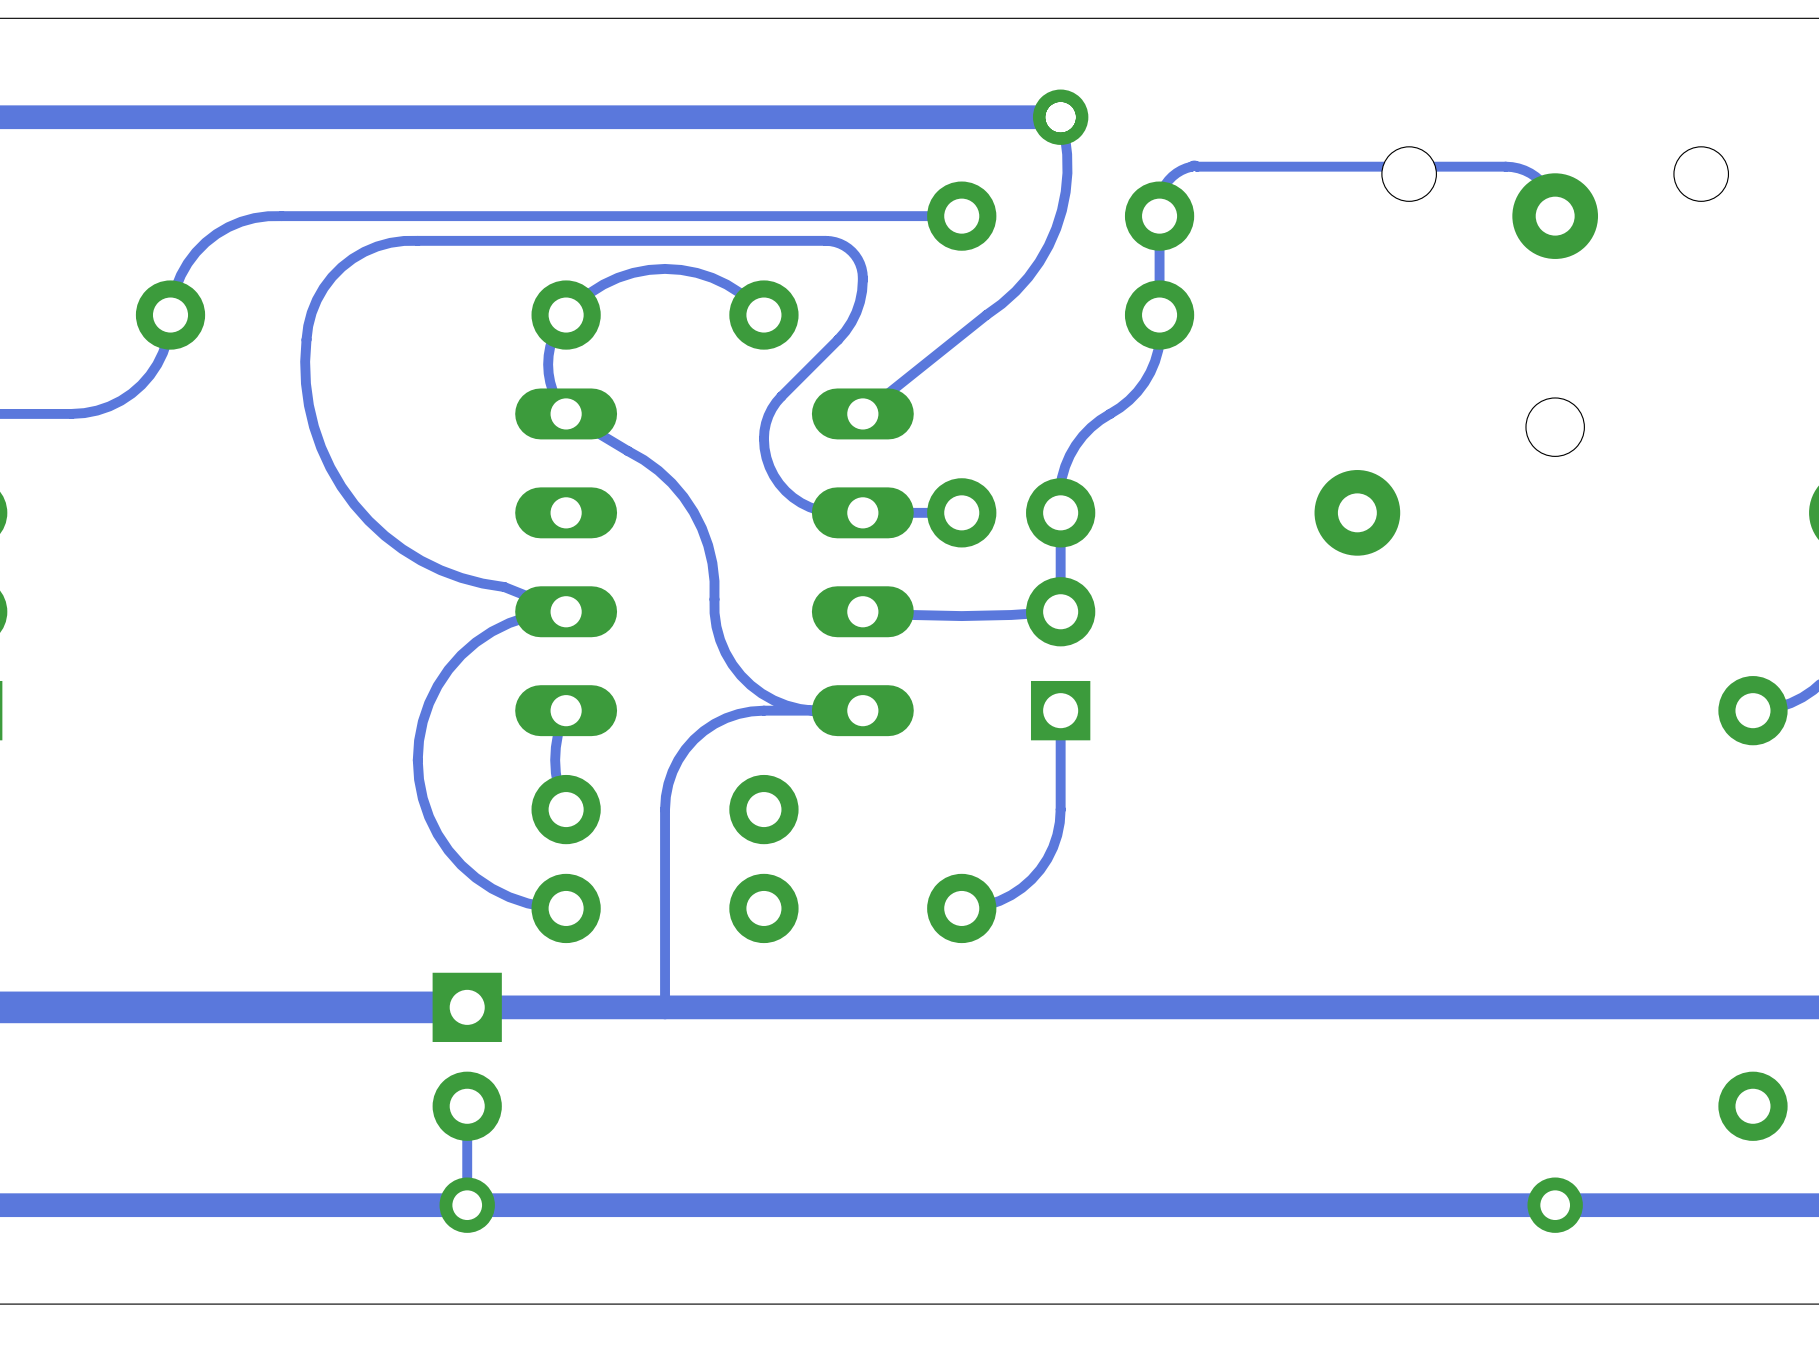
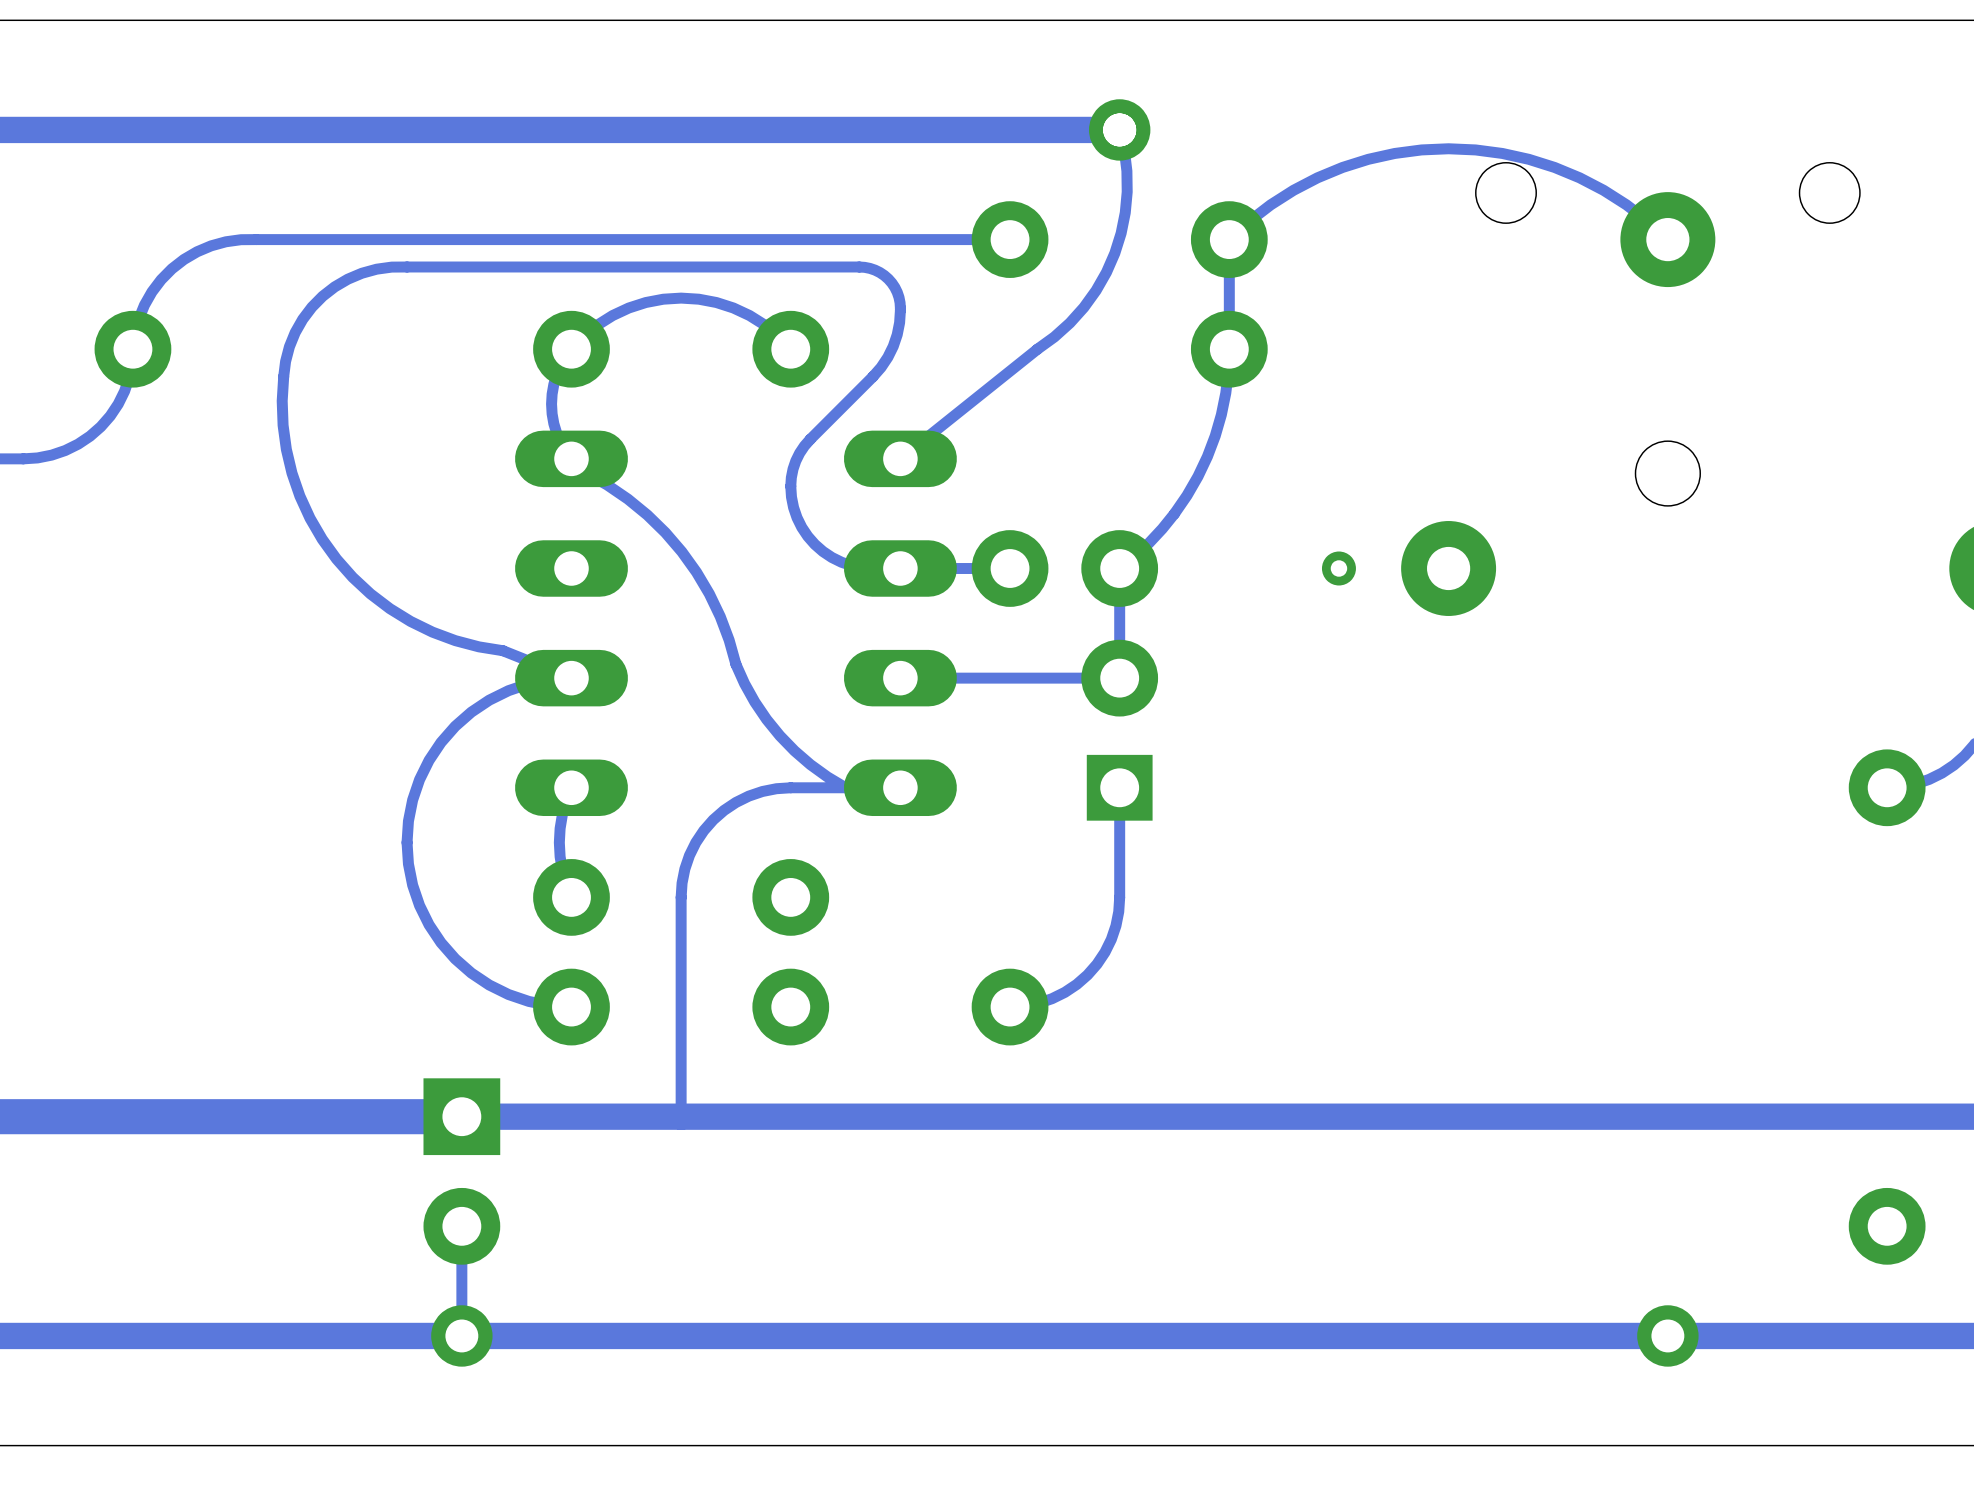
track: (1555, 216) (1553, 203) (1544, 186) (1530, 173) (1512, 167) (1194, 165) (1176, 173) (1165, 184) (1159, 199) (1159, 216) -> (1667, 239) (1626, 204) (1579, 177) (1528, 159) (1502, 153) (1448, 148) (1394, 153) (1368, 159) (1317, 177) (1270, 204) (1229, 239)
track: (1159, 315) (1158, 350) (1144, 382) (1129, 400) (1090, 427) (1069, 455) (1061, 477) (1060, 512) -> (1229, 349) (1228, 371) (1221, 414) (1207, 456) (1198, 476) (1187, 495) (1162, 528) (1119, 568)
track: (566, 413) (643, 459) (658, 470) (683, 496) (701, 528) (708, 545) (714, 581) (716, 626) (720, 640) (732, 664) (750, 685) (761, 693) (786, 705) (813, 710) -> (571, 458) (585, 472) (607, 484) (647, 515) (681, 551) (709, 593) (720, 616) (735, 664) (744, 683) (766, 719) (779, 735) (810, 764) (845, 787)
via: none -> (1338, 568)
track: (1060, 611) (961, 616) (862, 611) -> (1119, 705) (1119, 678) (900, 678)

